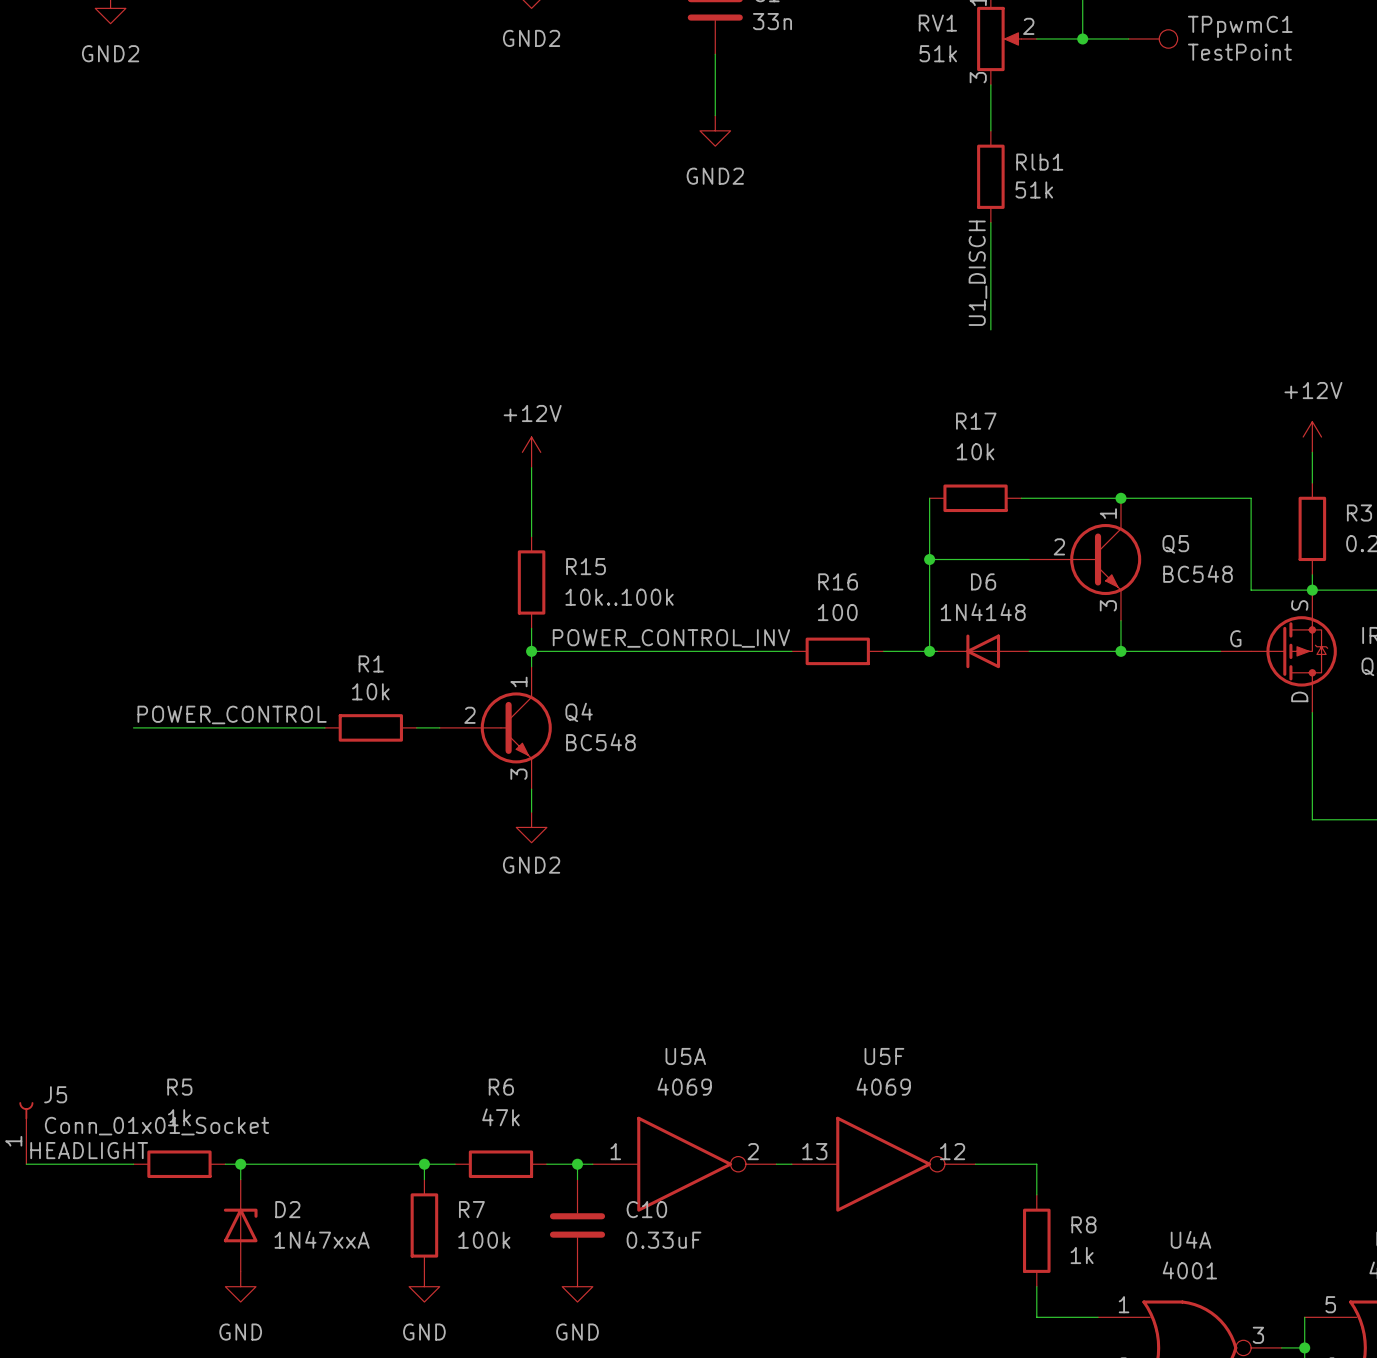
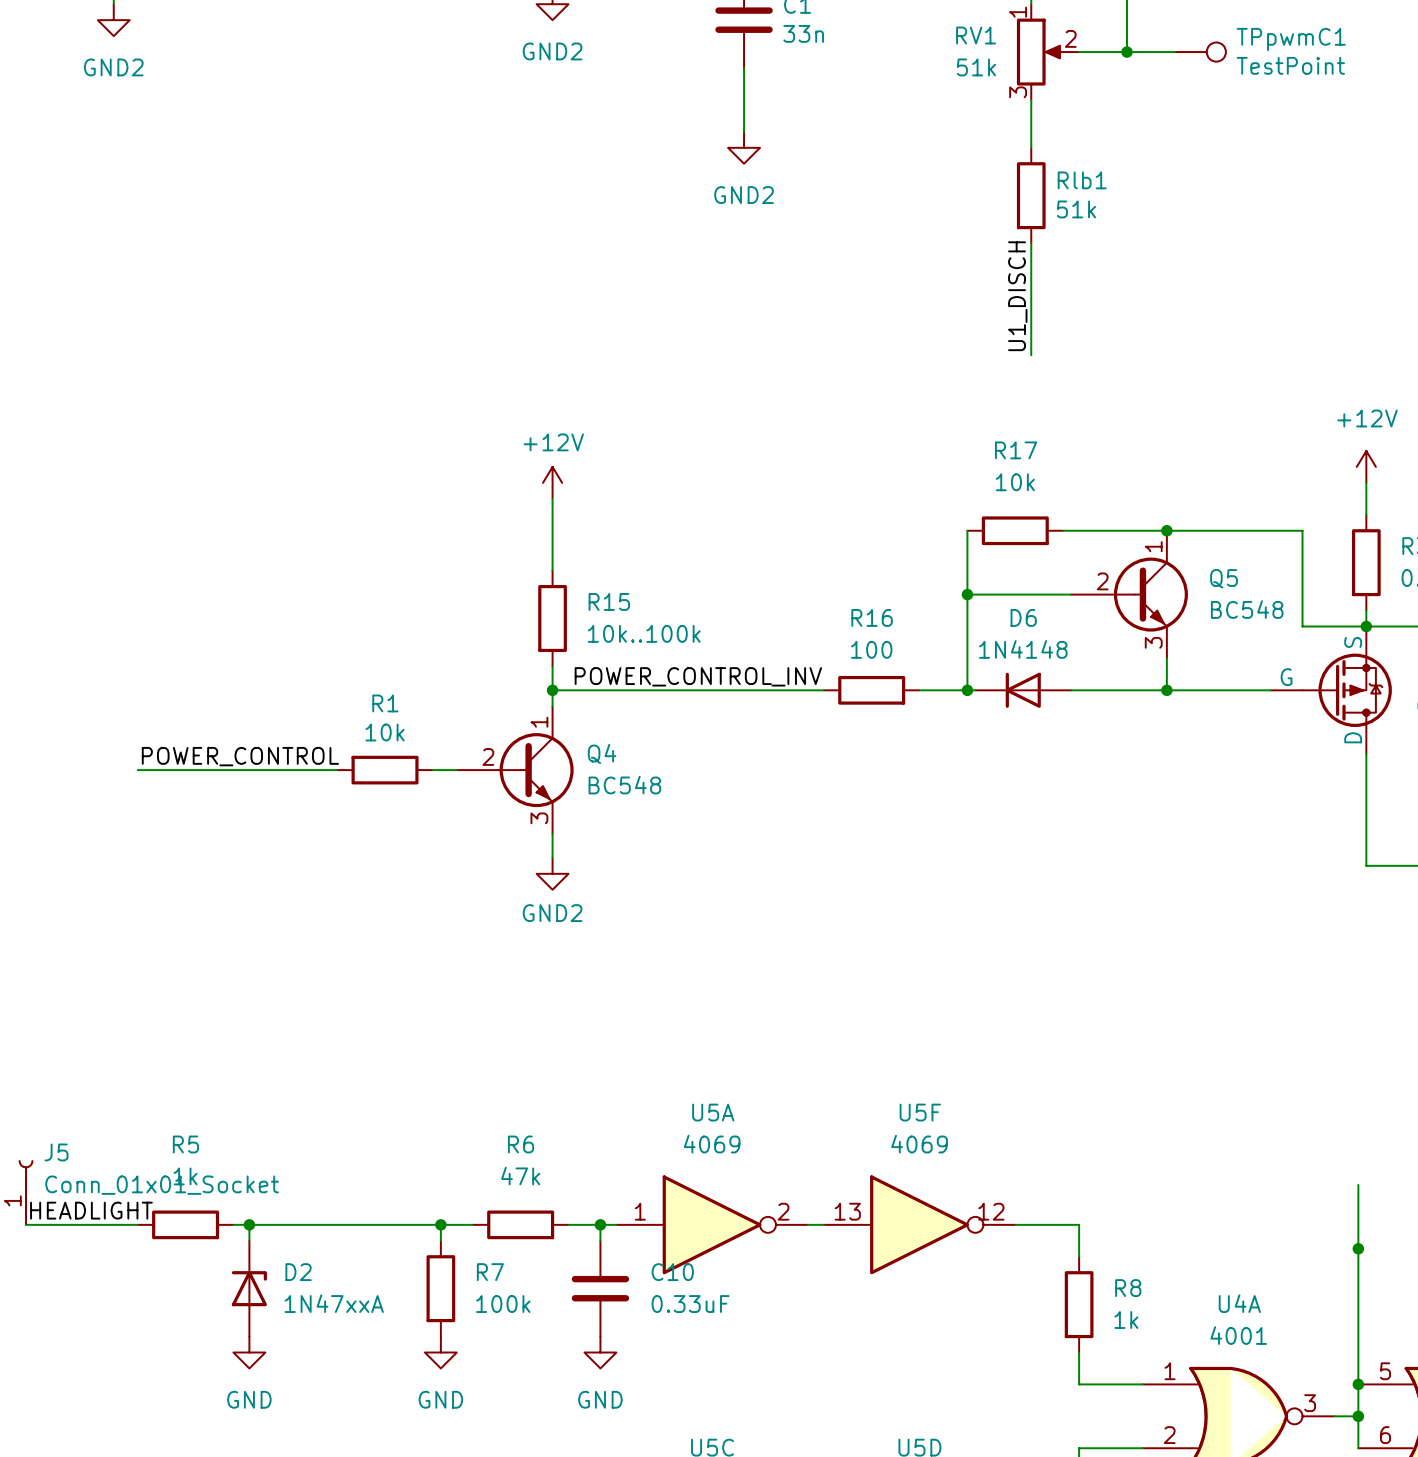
wire: none -> (1358, 1184) (1358, 1384)
junction: none -> (1358, 1248)
junction: none -> (1358, 1384)

